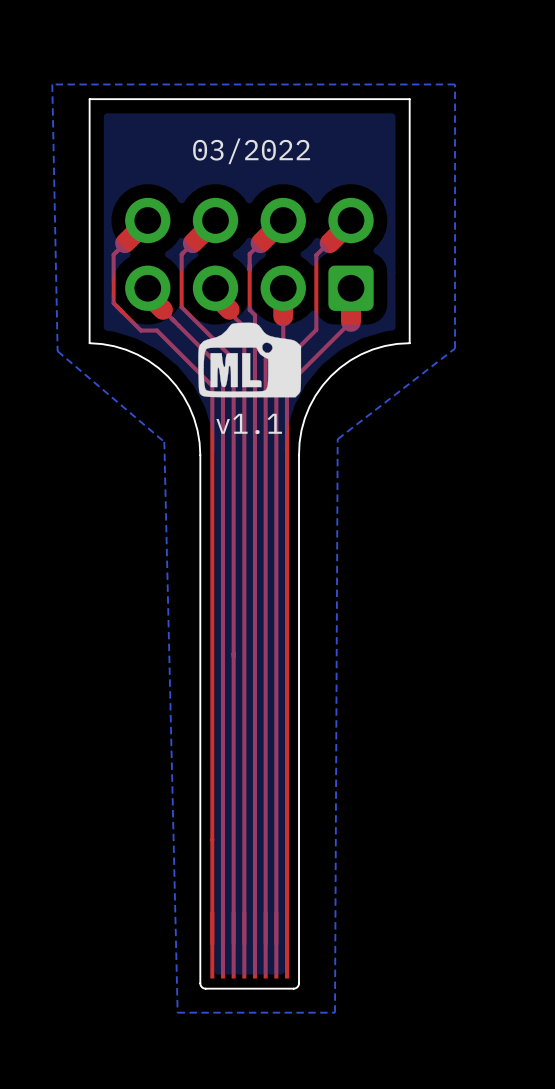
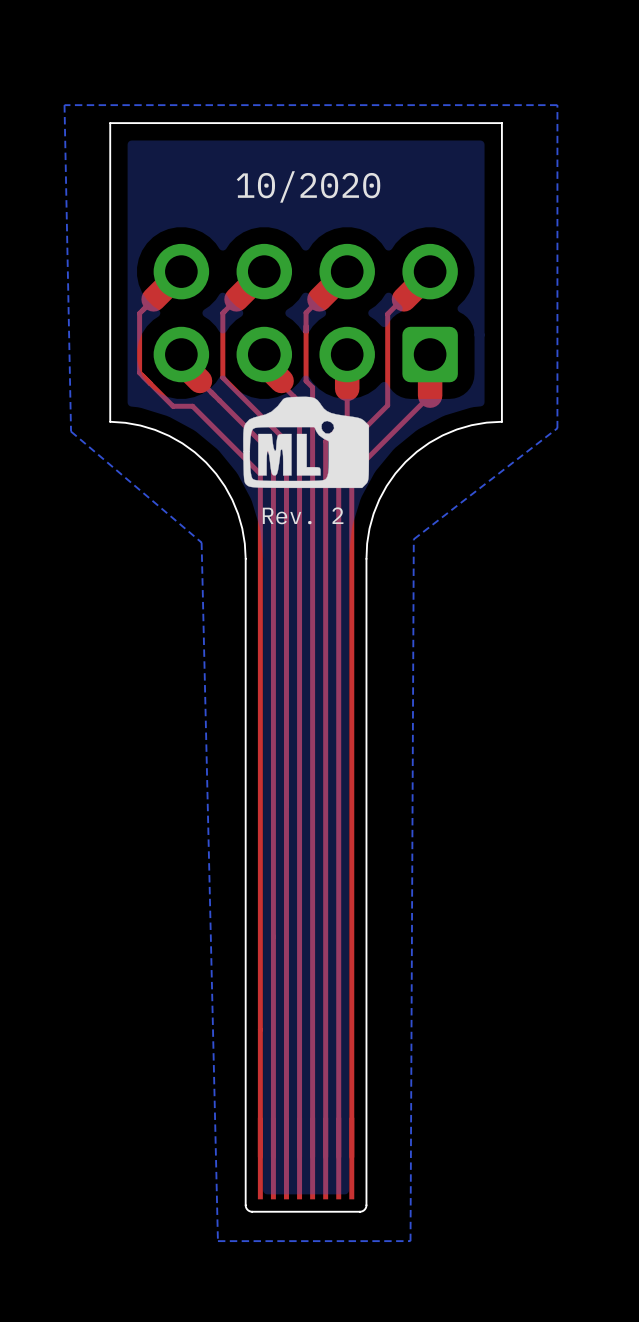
text: 03/2022 (251, 151) -> 10/2020 (308, 186)
text: v1.1 (249, 423) -> Rev. 2 (303, 515)

